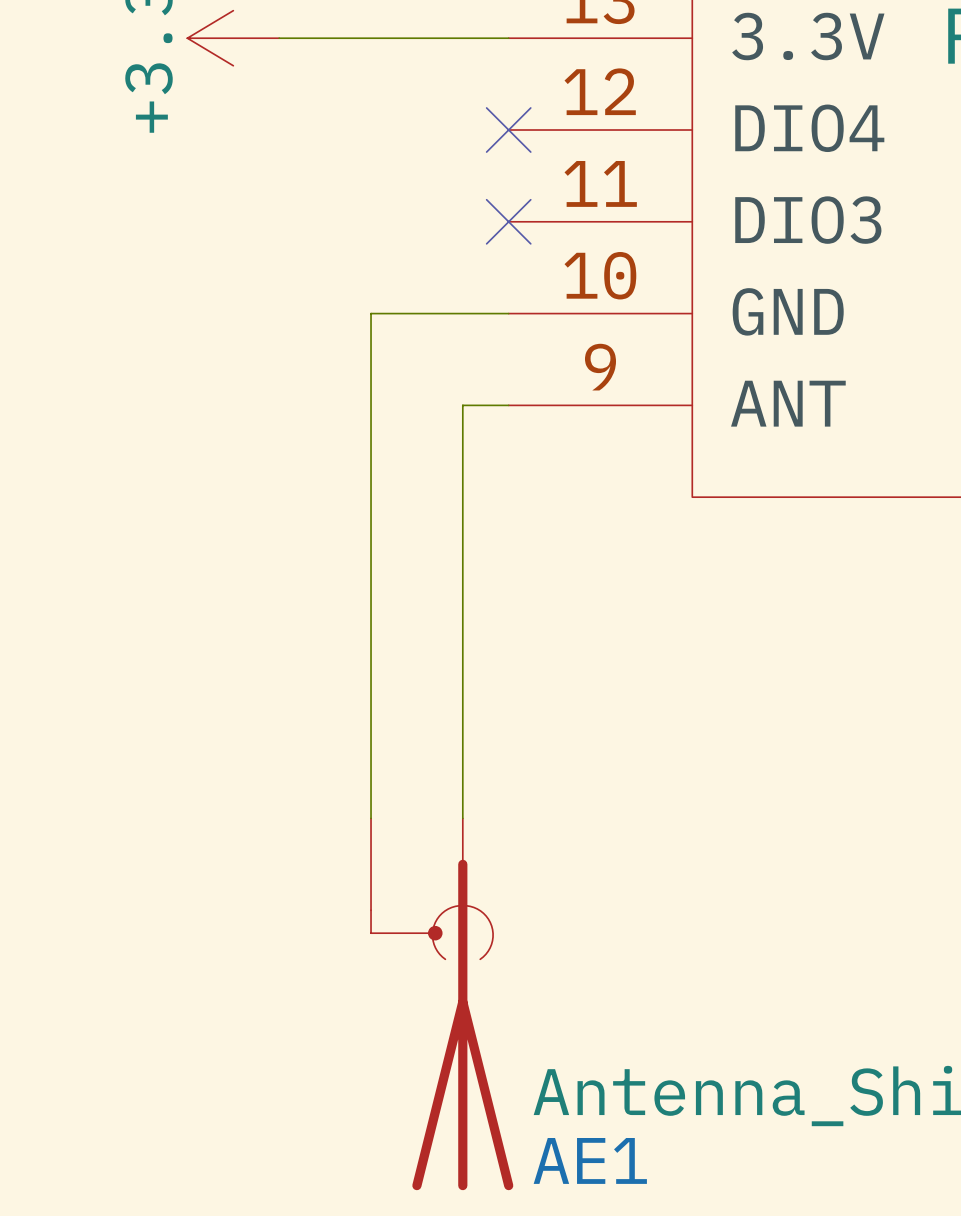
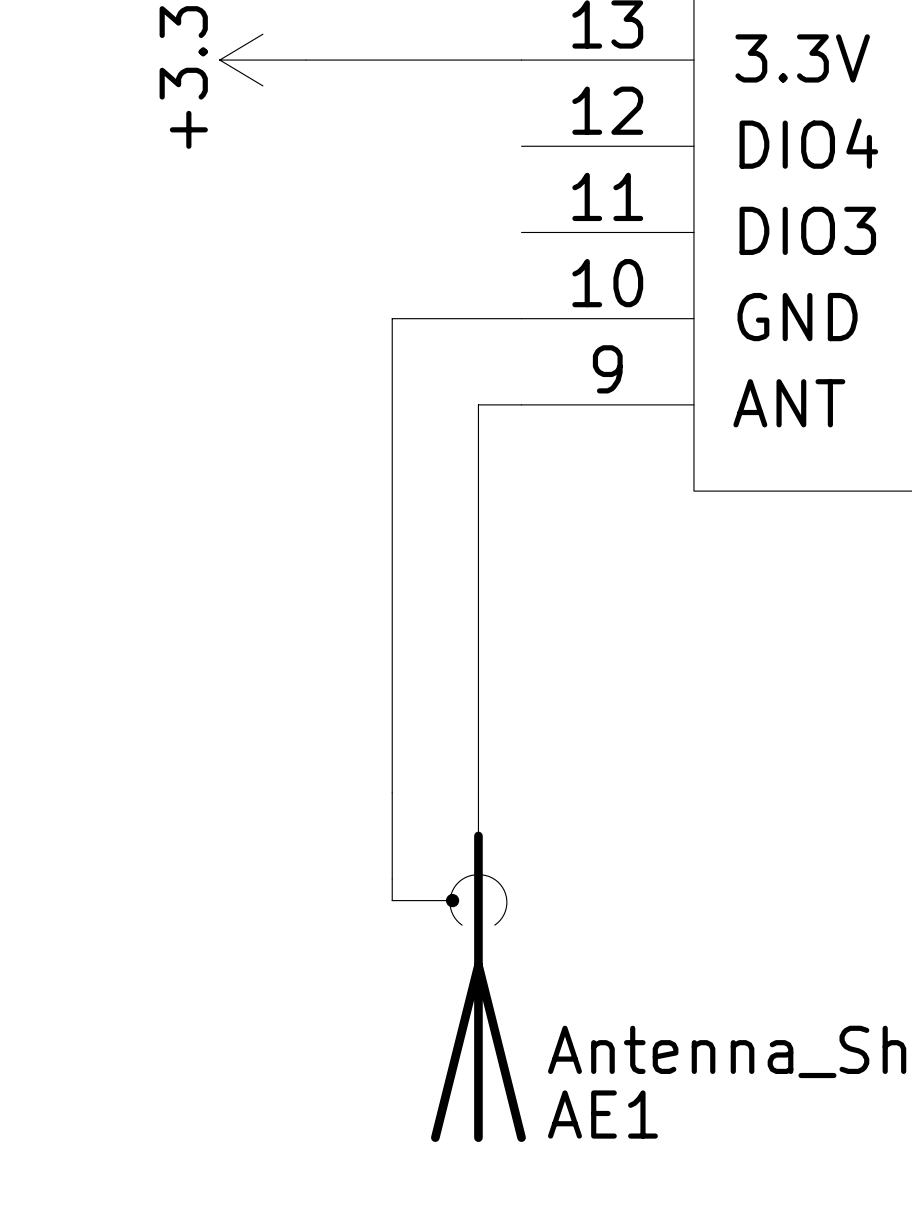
no-connect mark: (508, 130) -> none
no-connect mark: (508, 221) -> none

